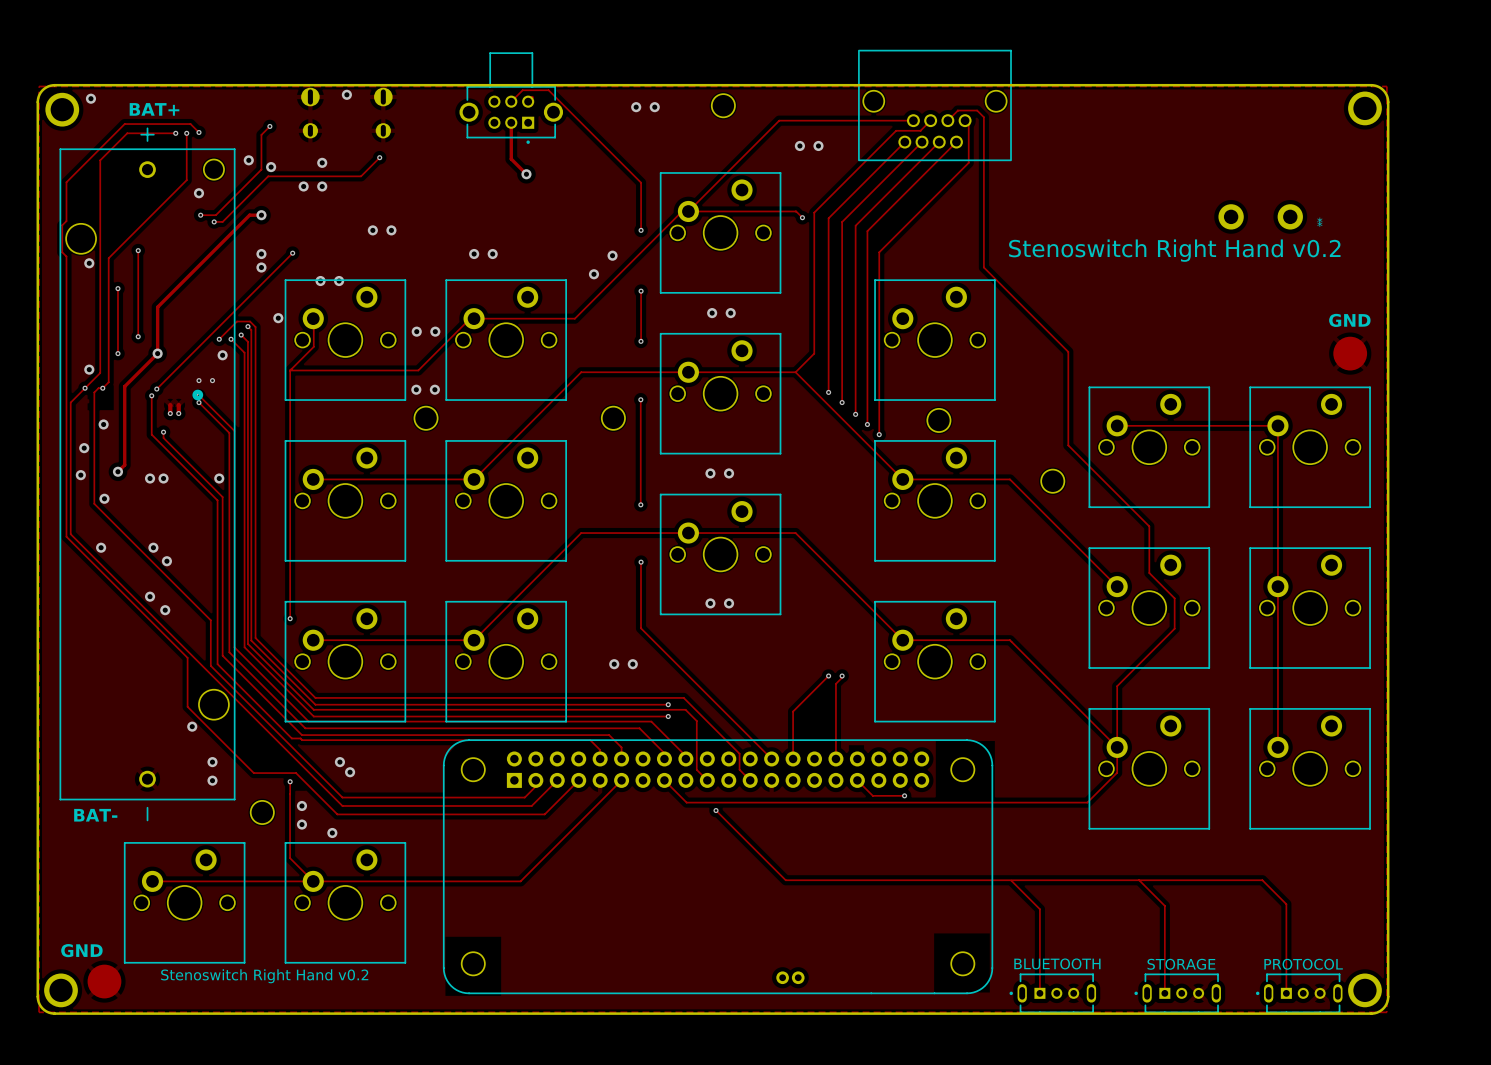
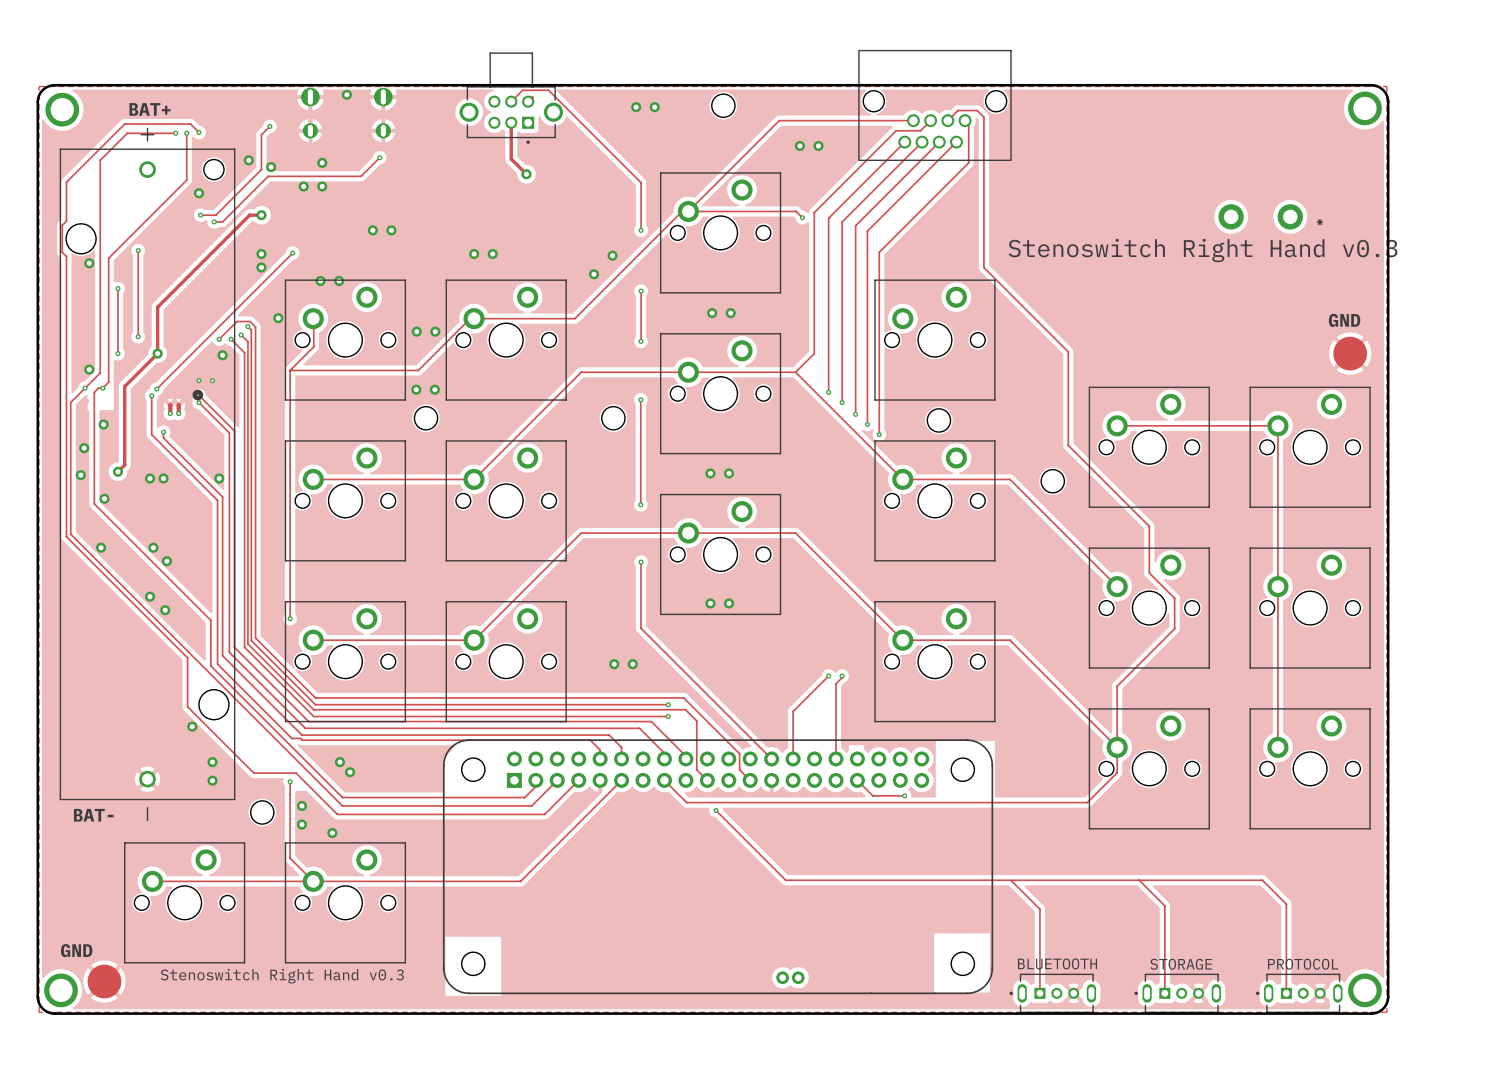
via: (90, 98) -> none
text: Stenoswitch Right Hand v0.2 (1174, 250) -> Stenoswitch Right Hand v0.3 (1202, 250)
text: Stenoswitch Right Hand v0.2 (264, 976) -> Stenoswitch Right Hand v0.3 (282, 976)

